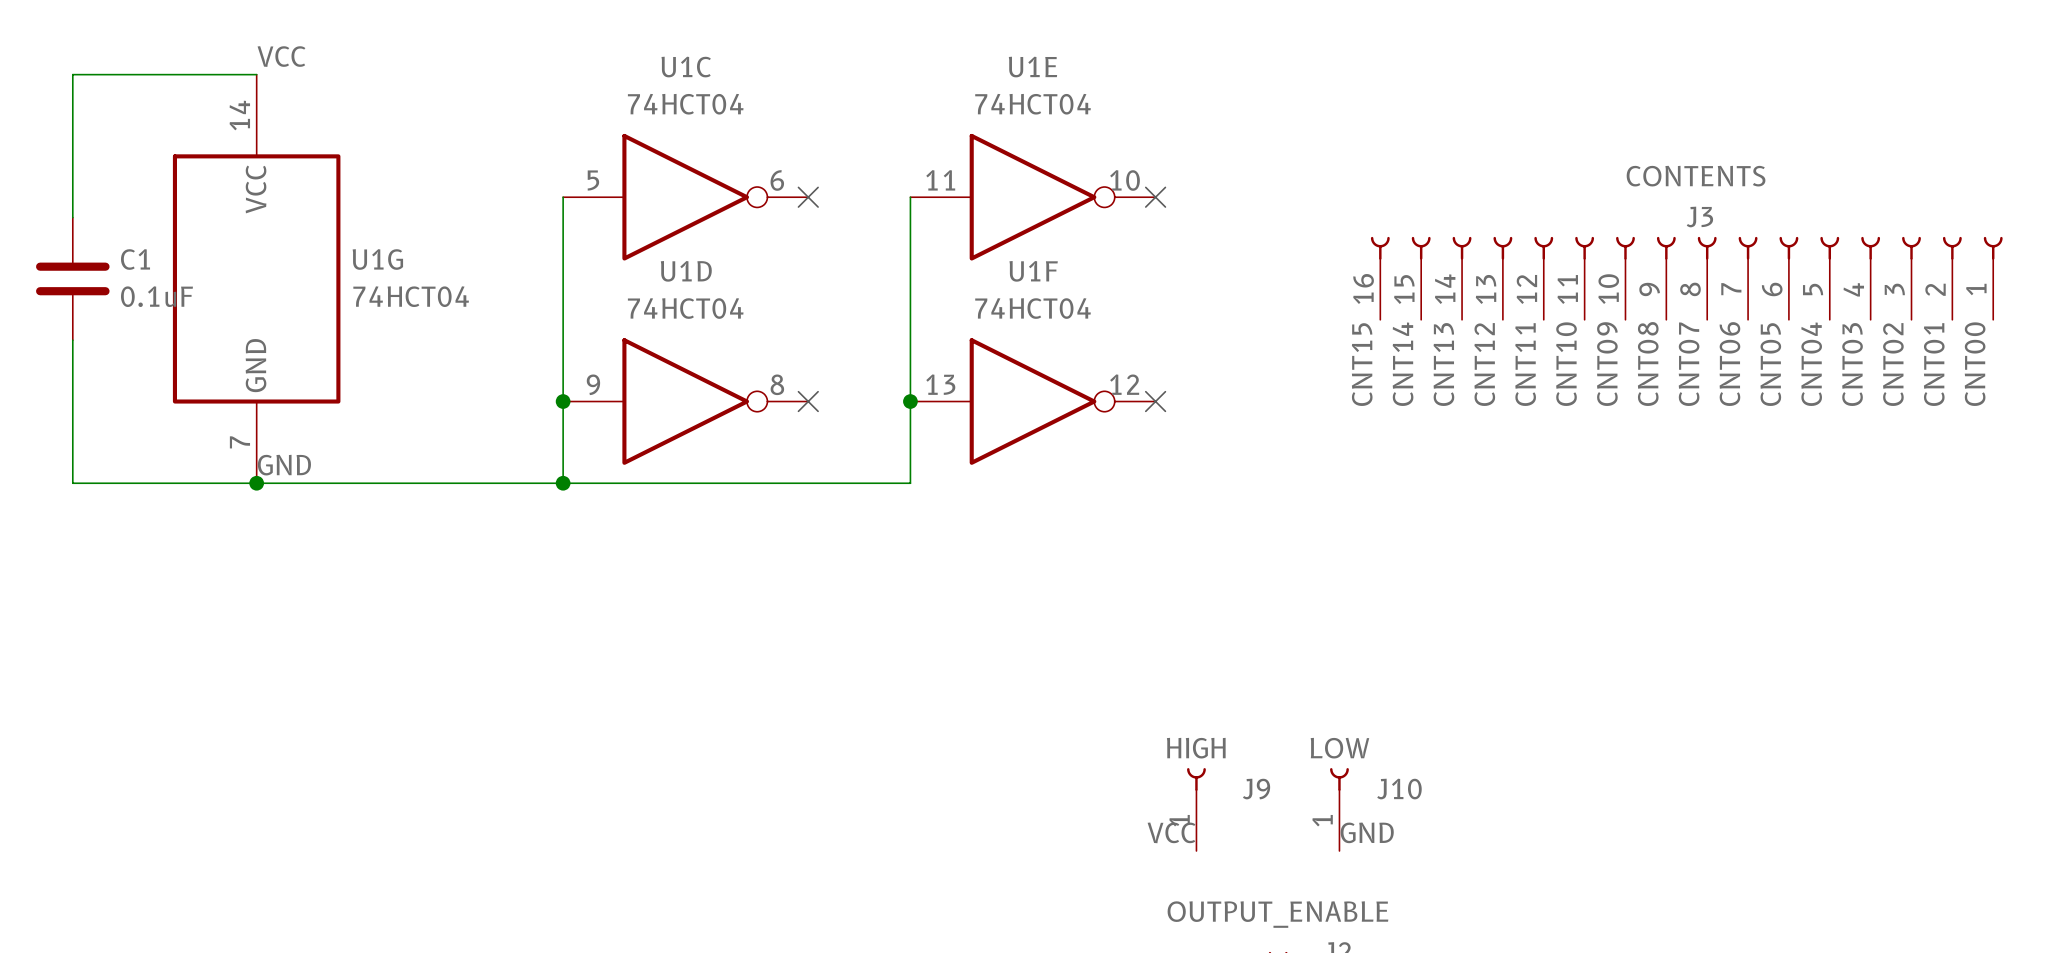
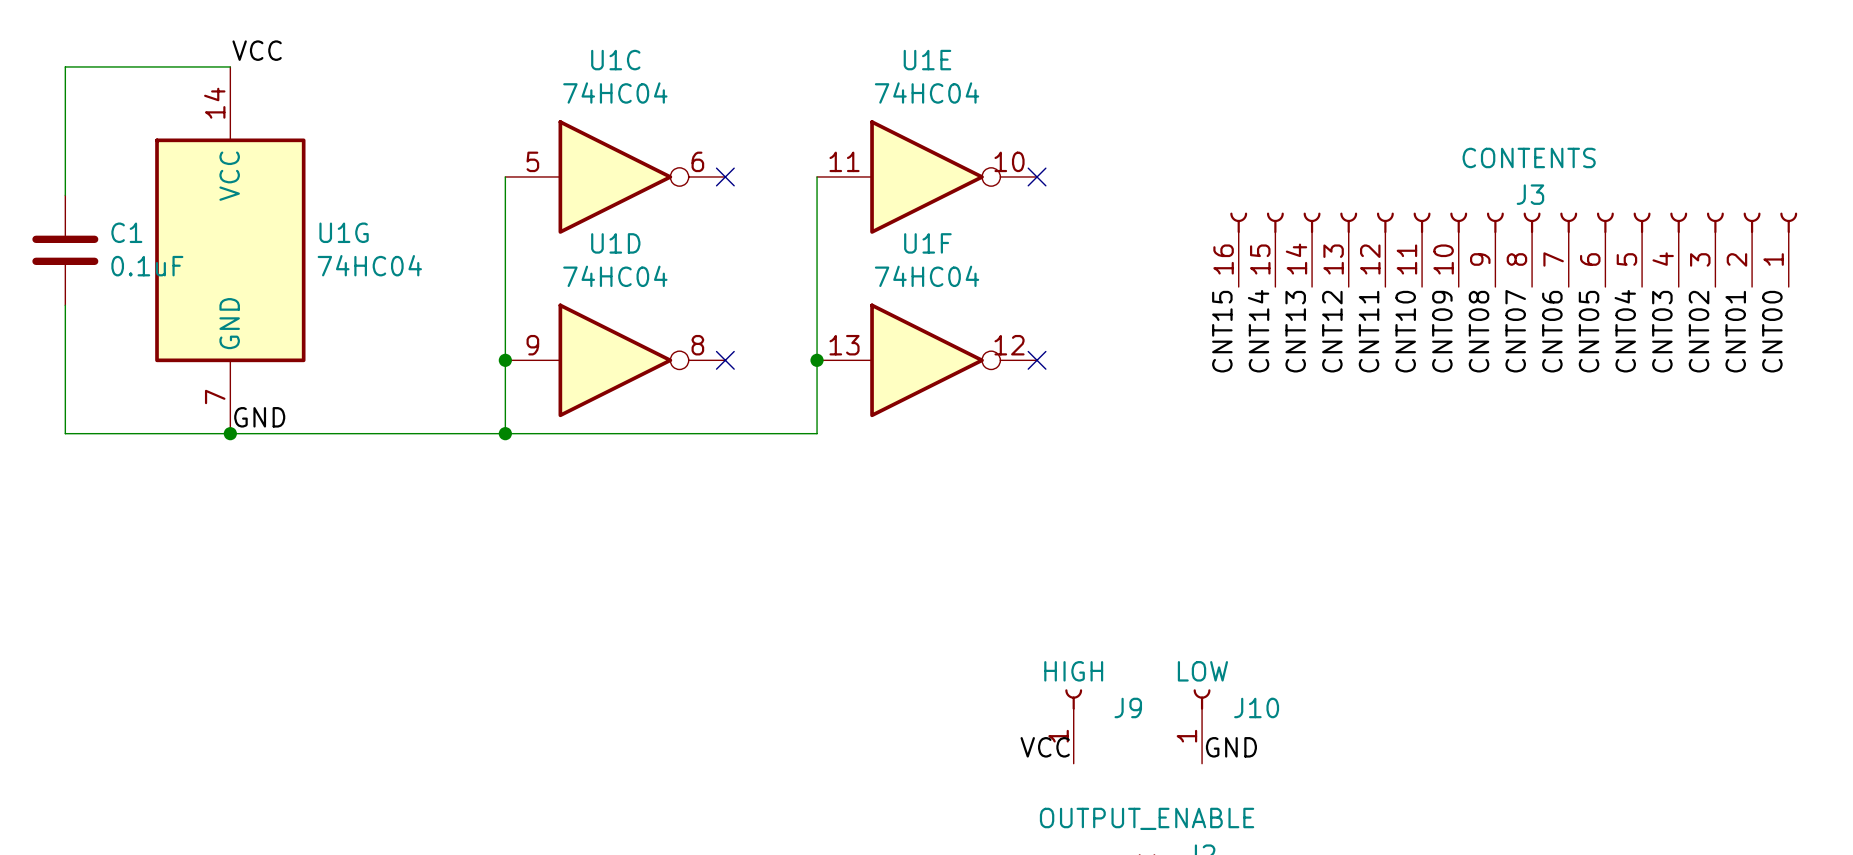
U1C value: 74HCT04 (685, 104) -> 74HC04 (615, 93)
U1E value: 74HCT04 (1033, 104) -> 74HC04 (927, 93)
U1G value: 74HCT04 (411, 296) -> 74HC04 (369, 265)
U1D value: 74HCT04 (685, 308) -> 74HC04 (615, 276)
U1F value: 74HCT04 (1033, 308) -> 74HC04 (927, 276)

